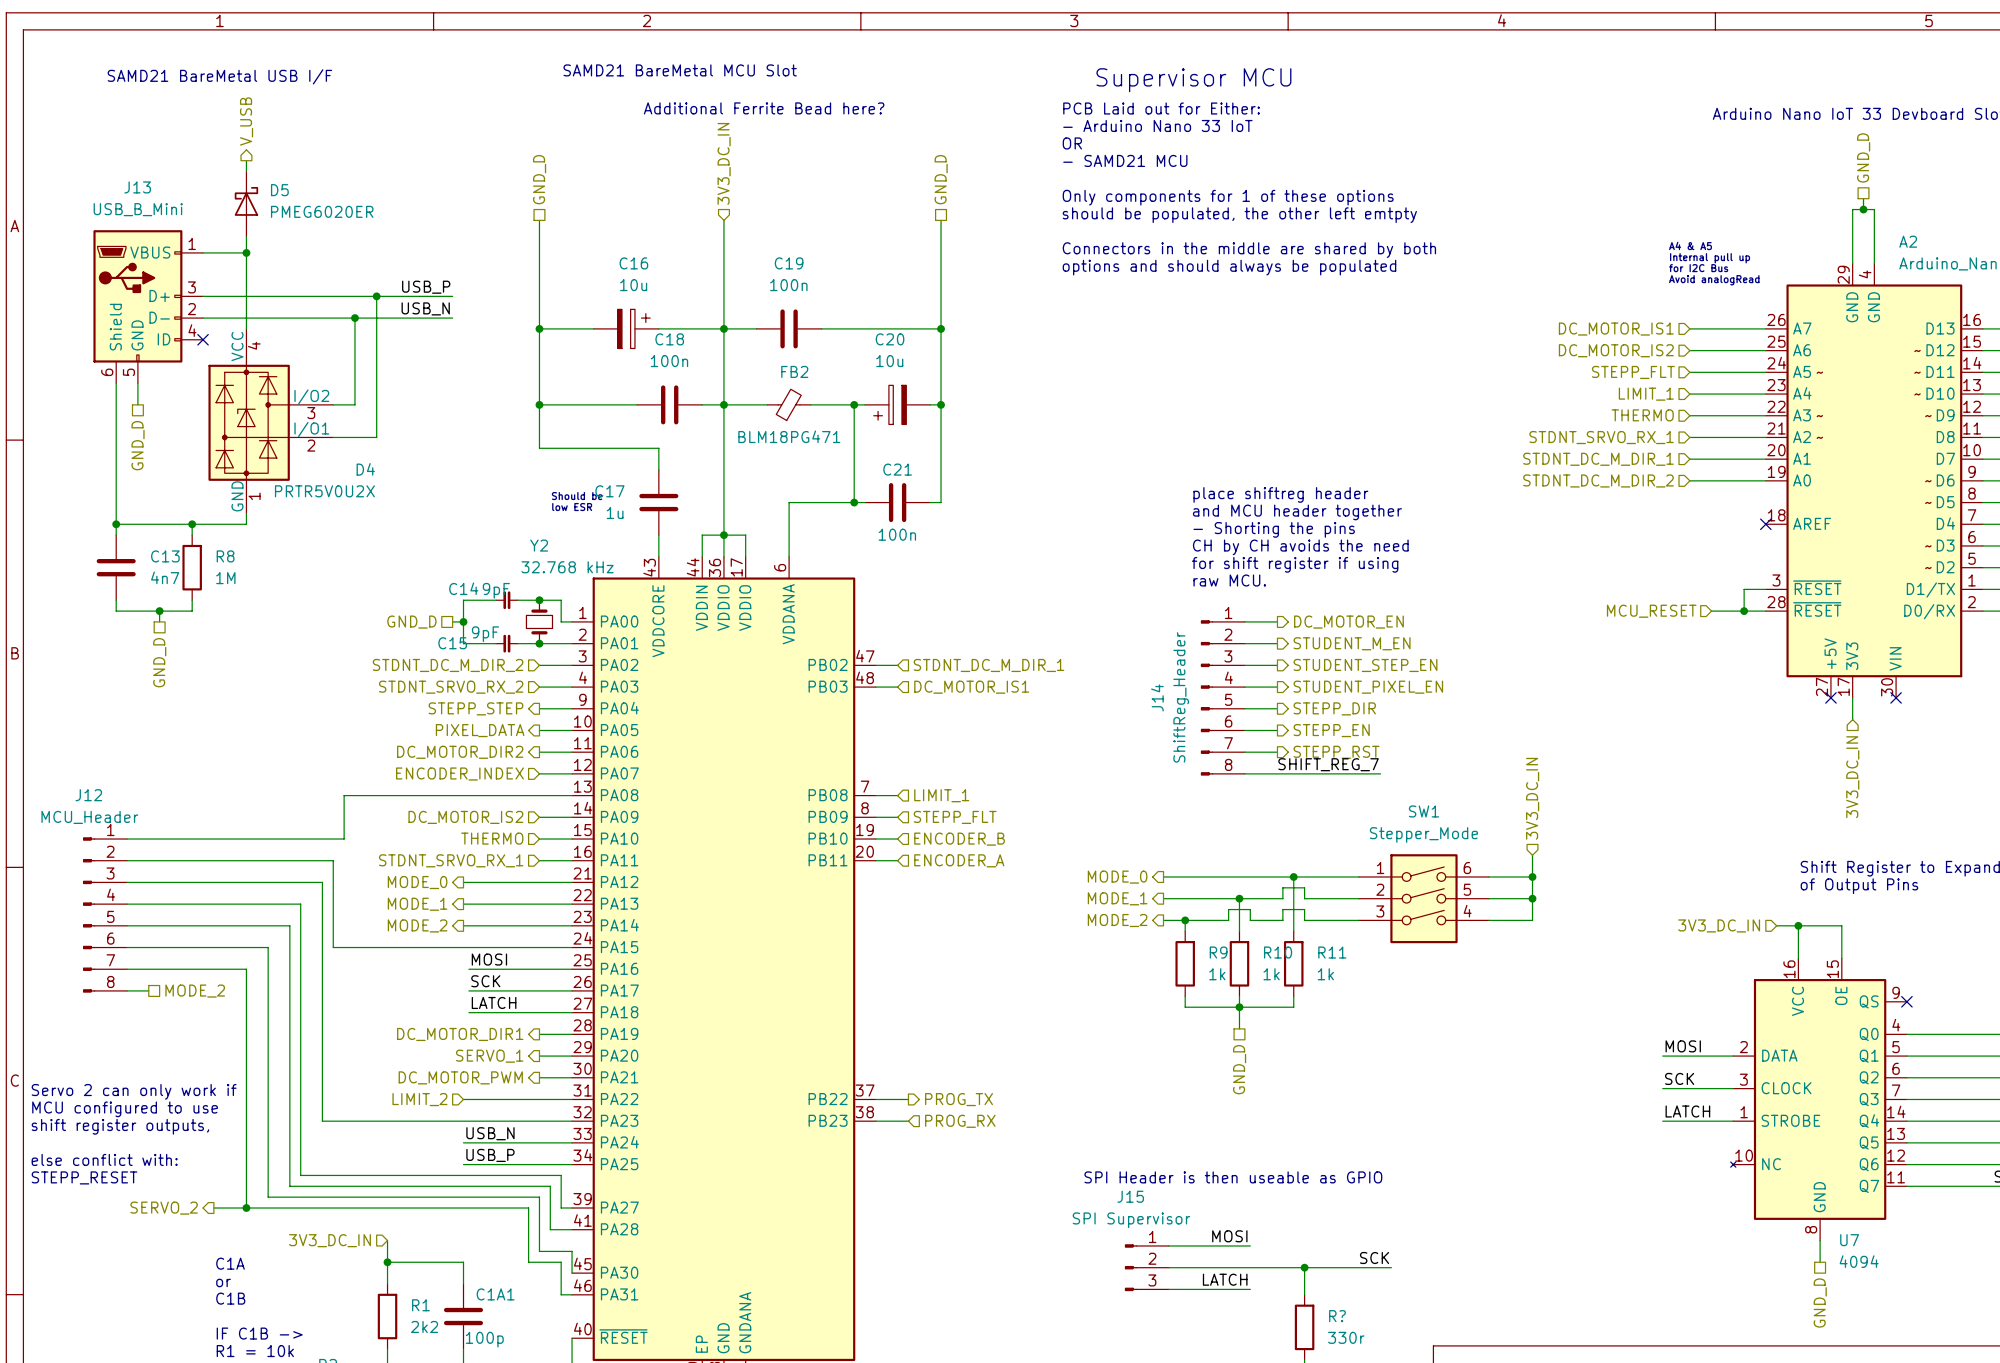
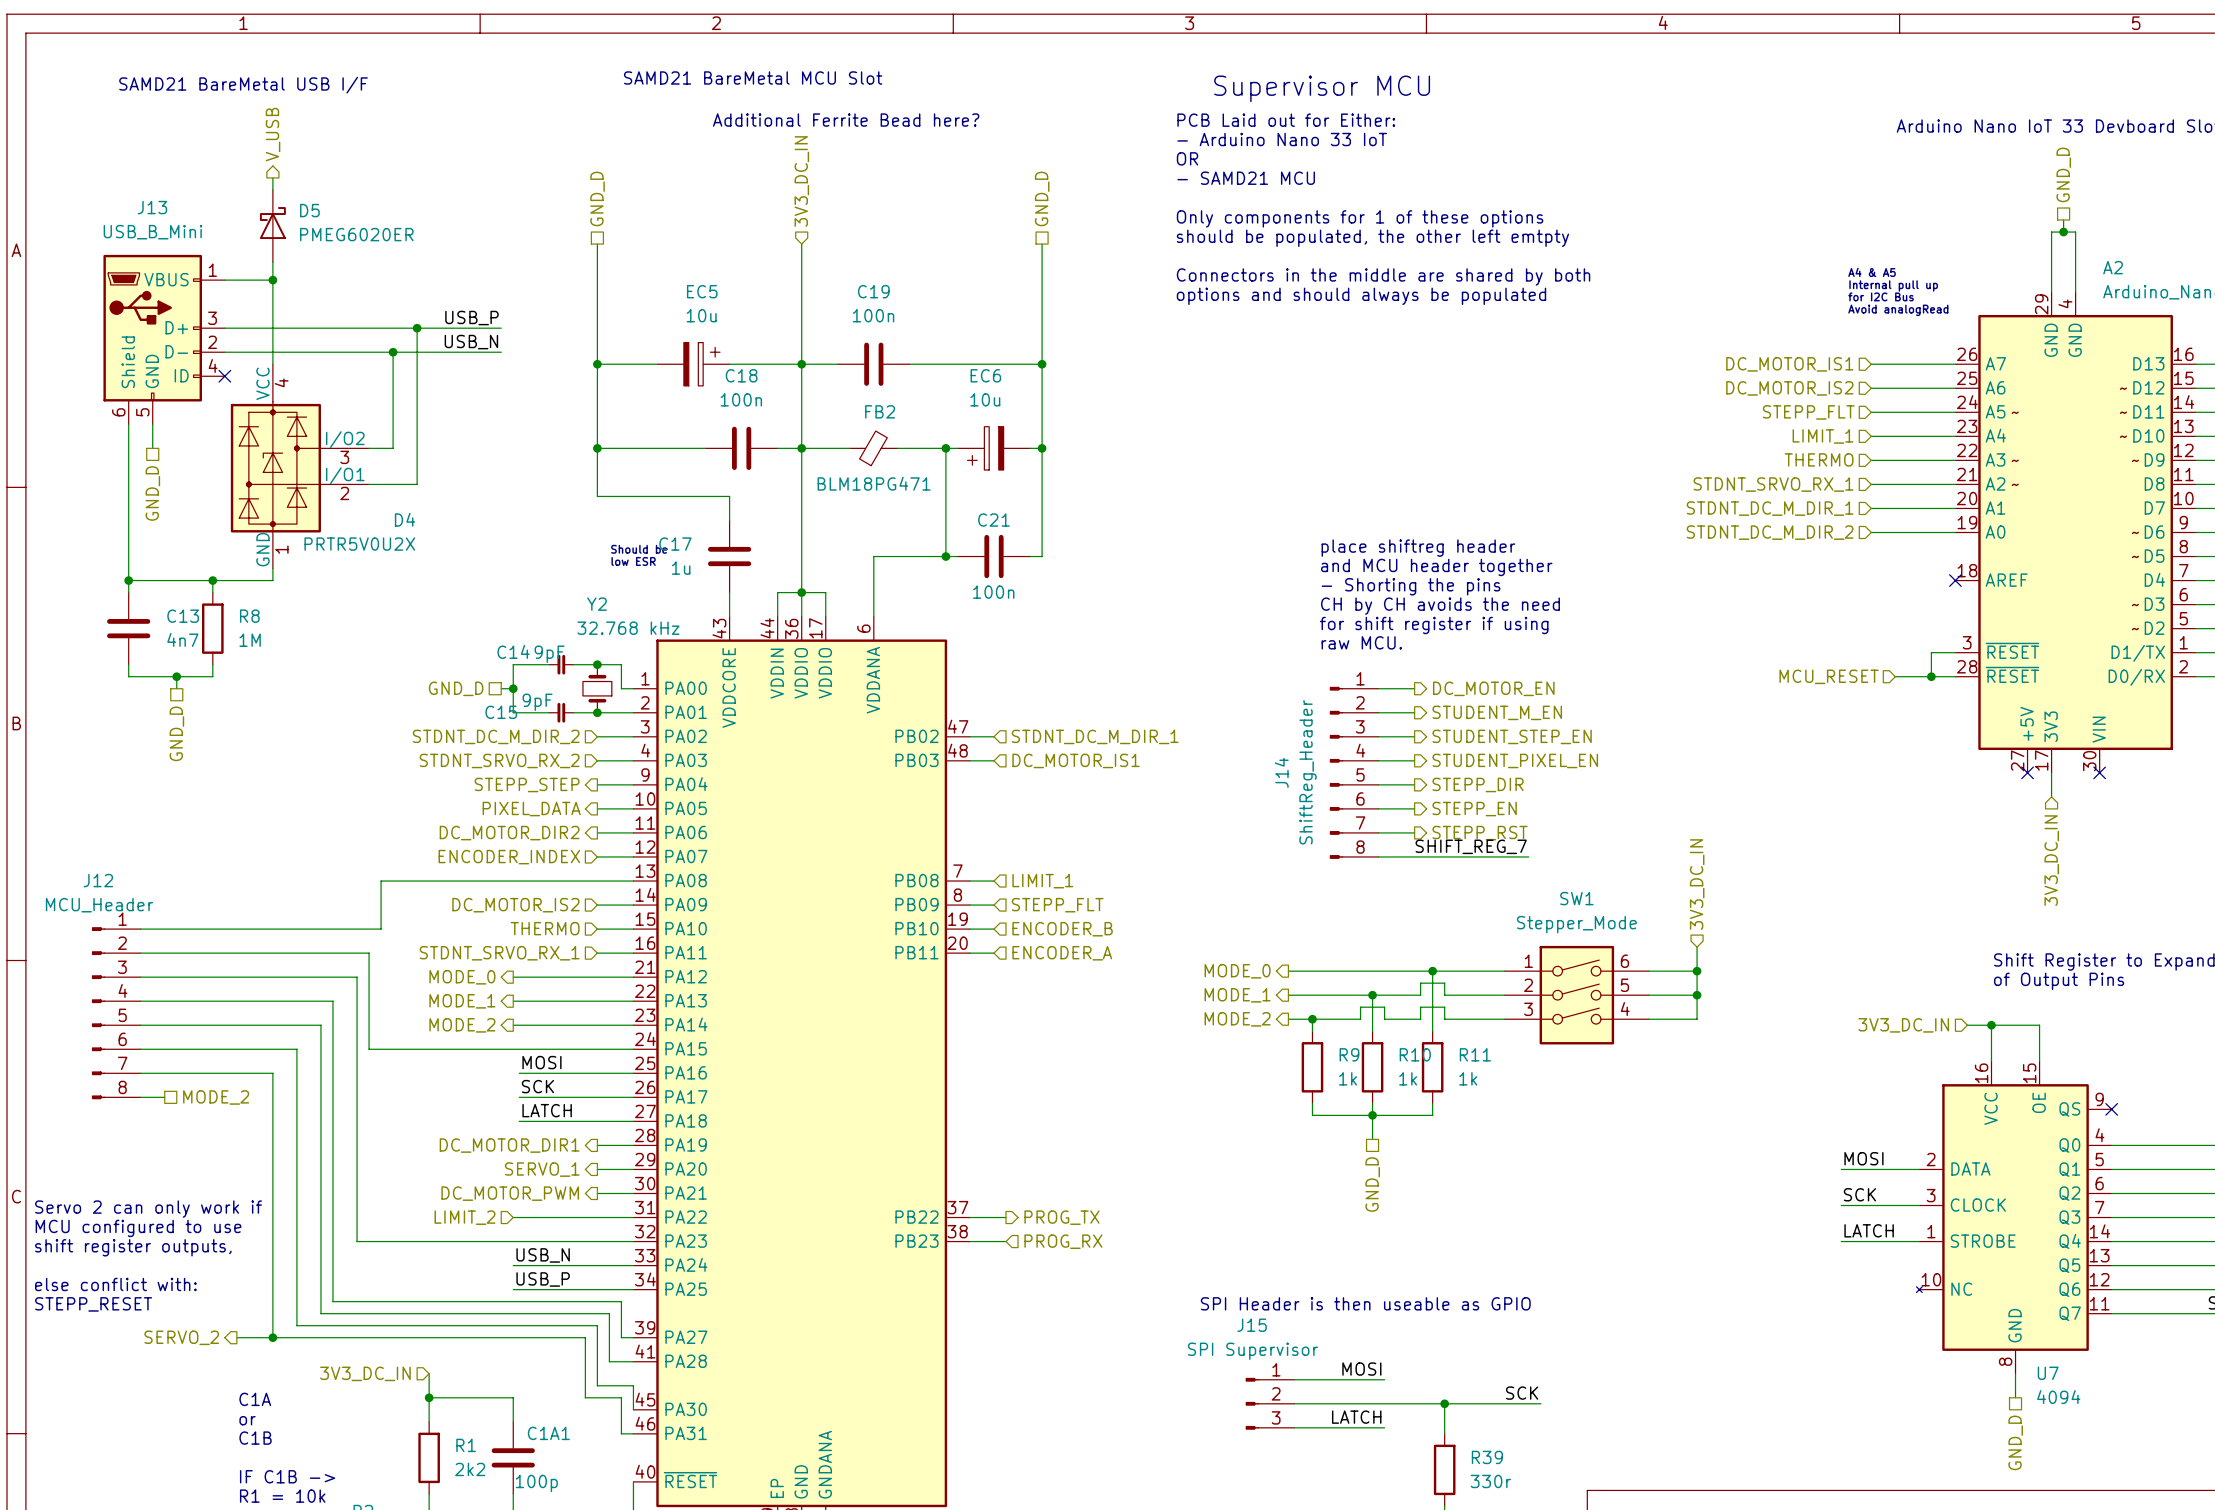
C16 name: C16 (633, 263) -> EC5 (702, 291)
C20 name: C20 (890, 339) -> EC6 (985, 375)
R? name: R? (1337, 1316) -> R39 (1487, 1457)

